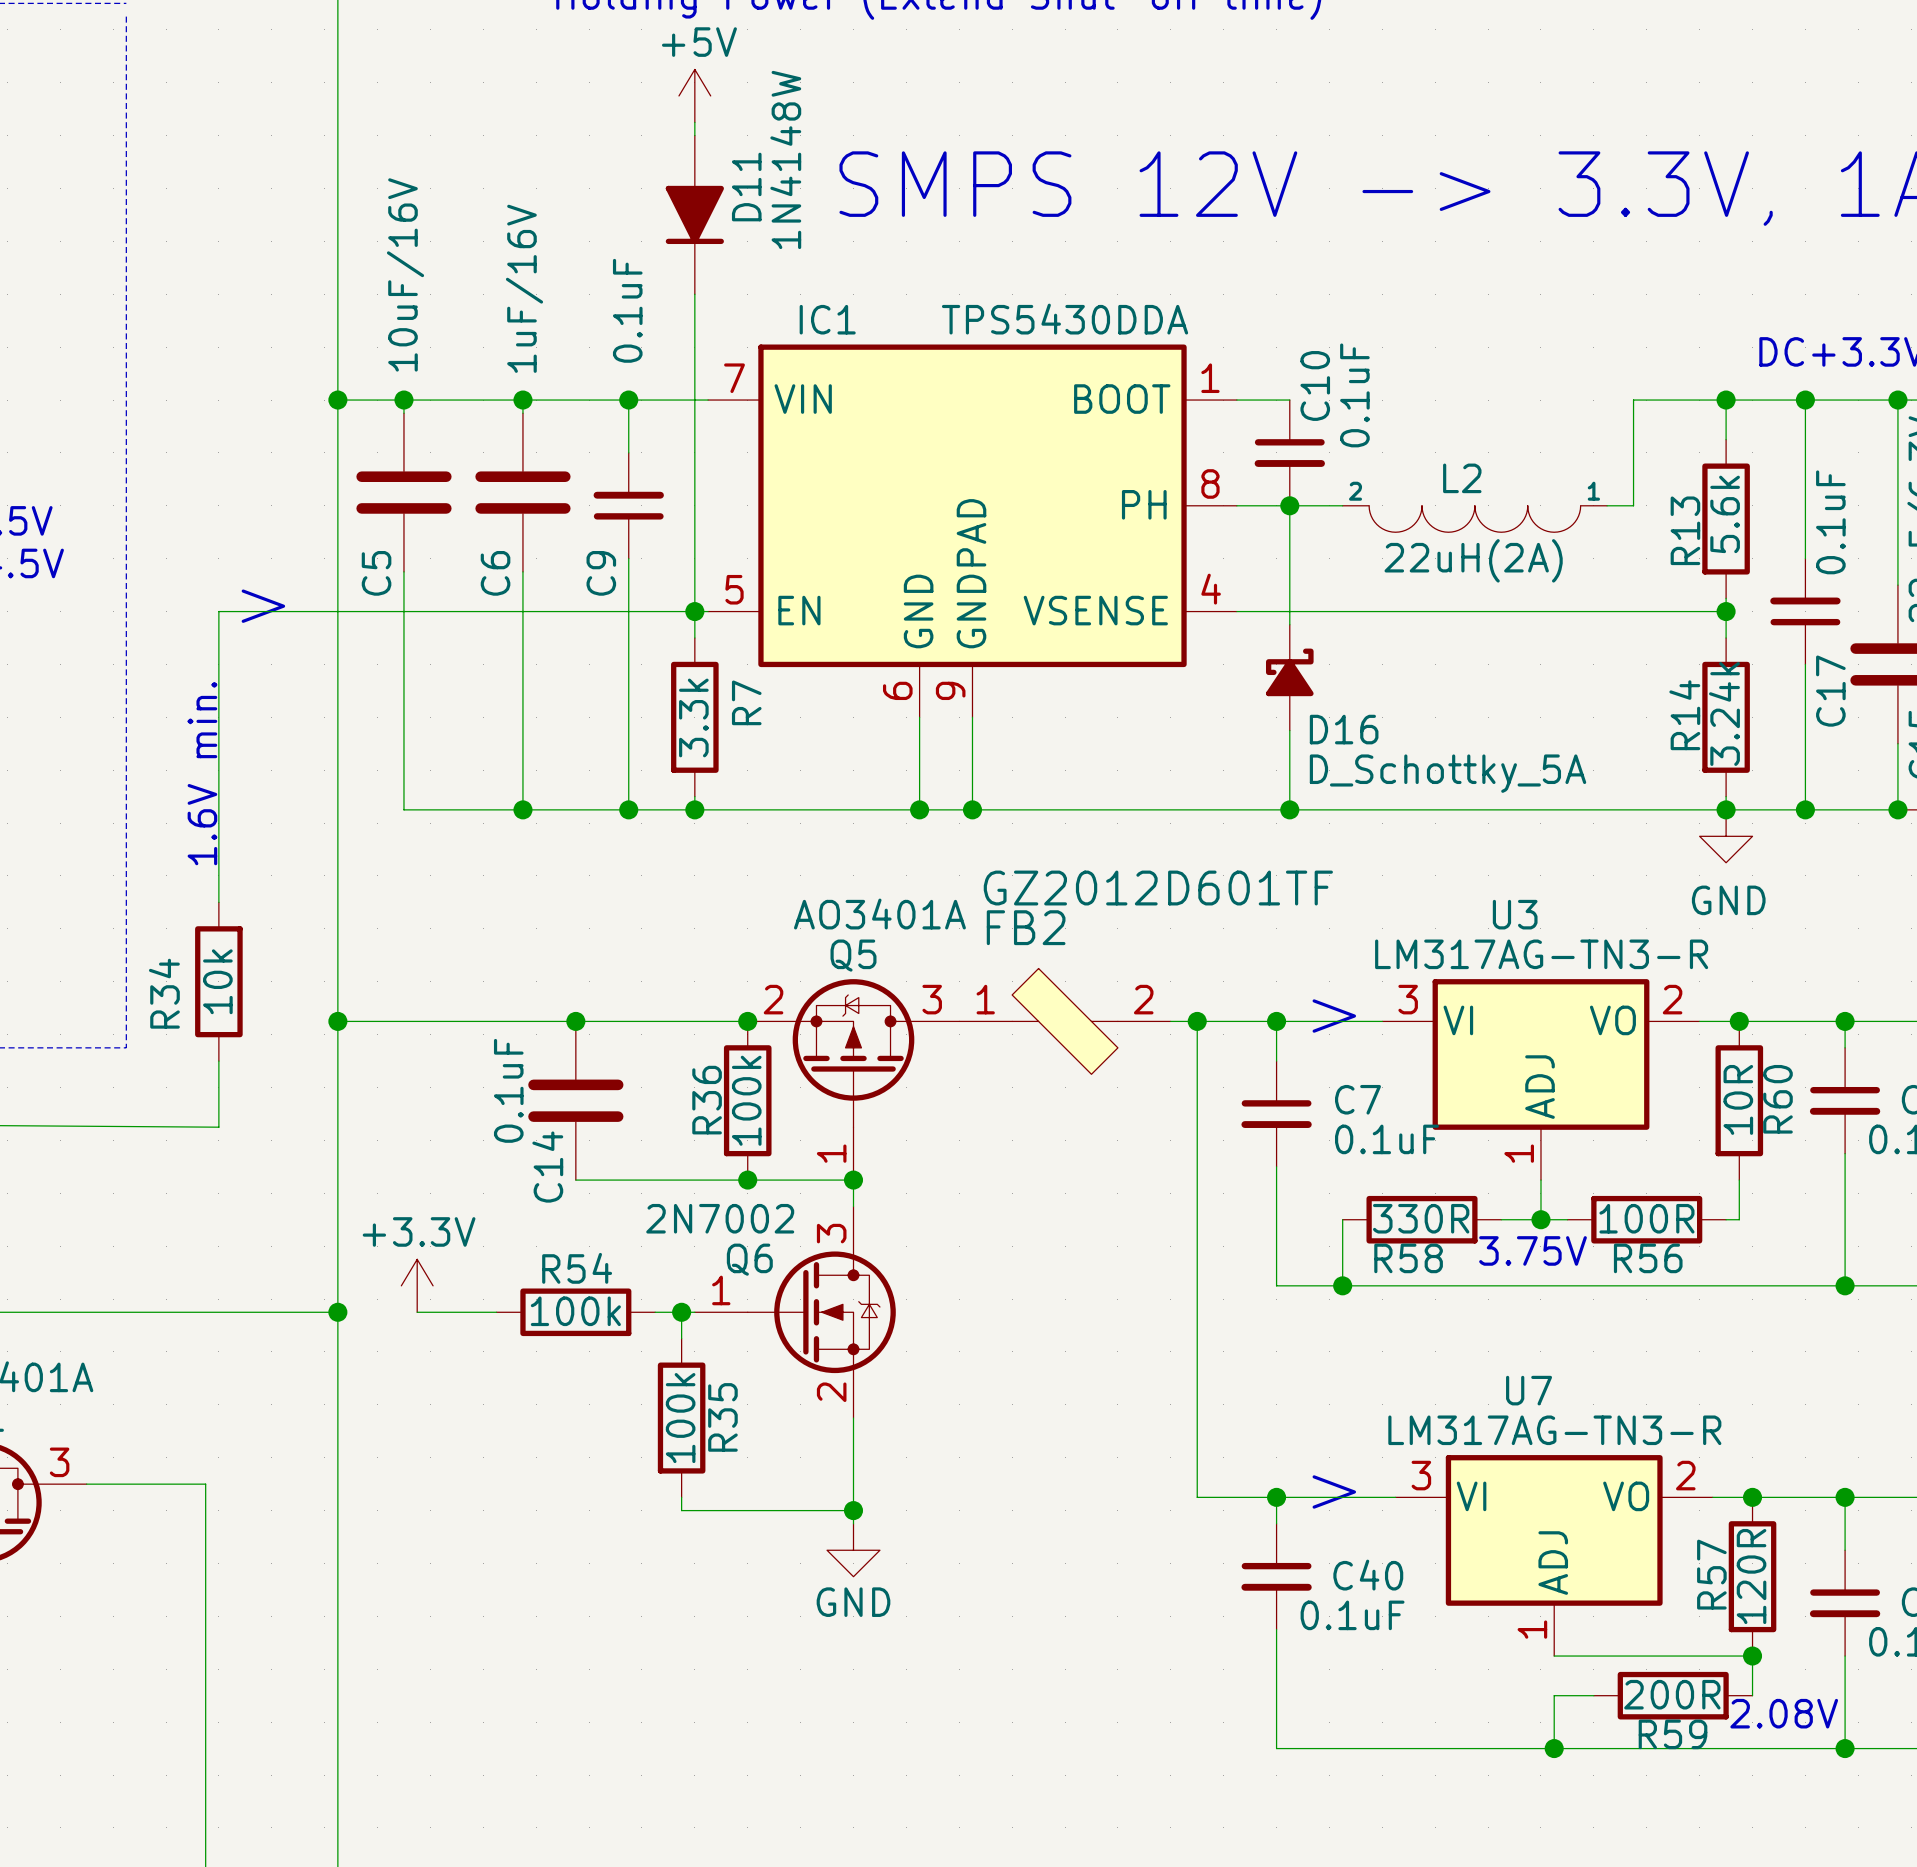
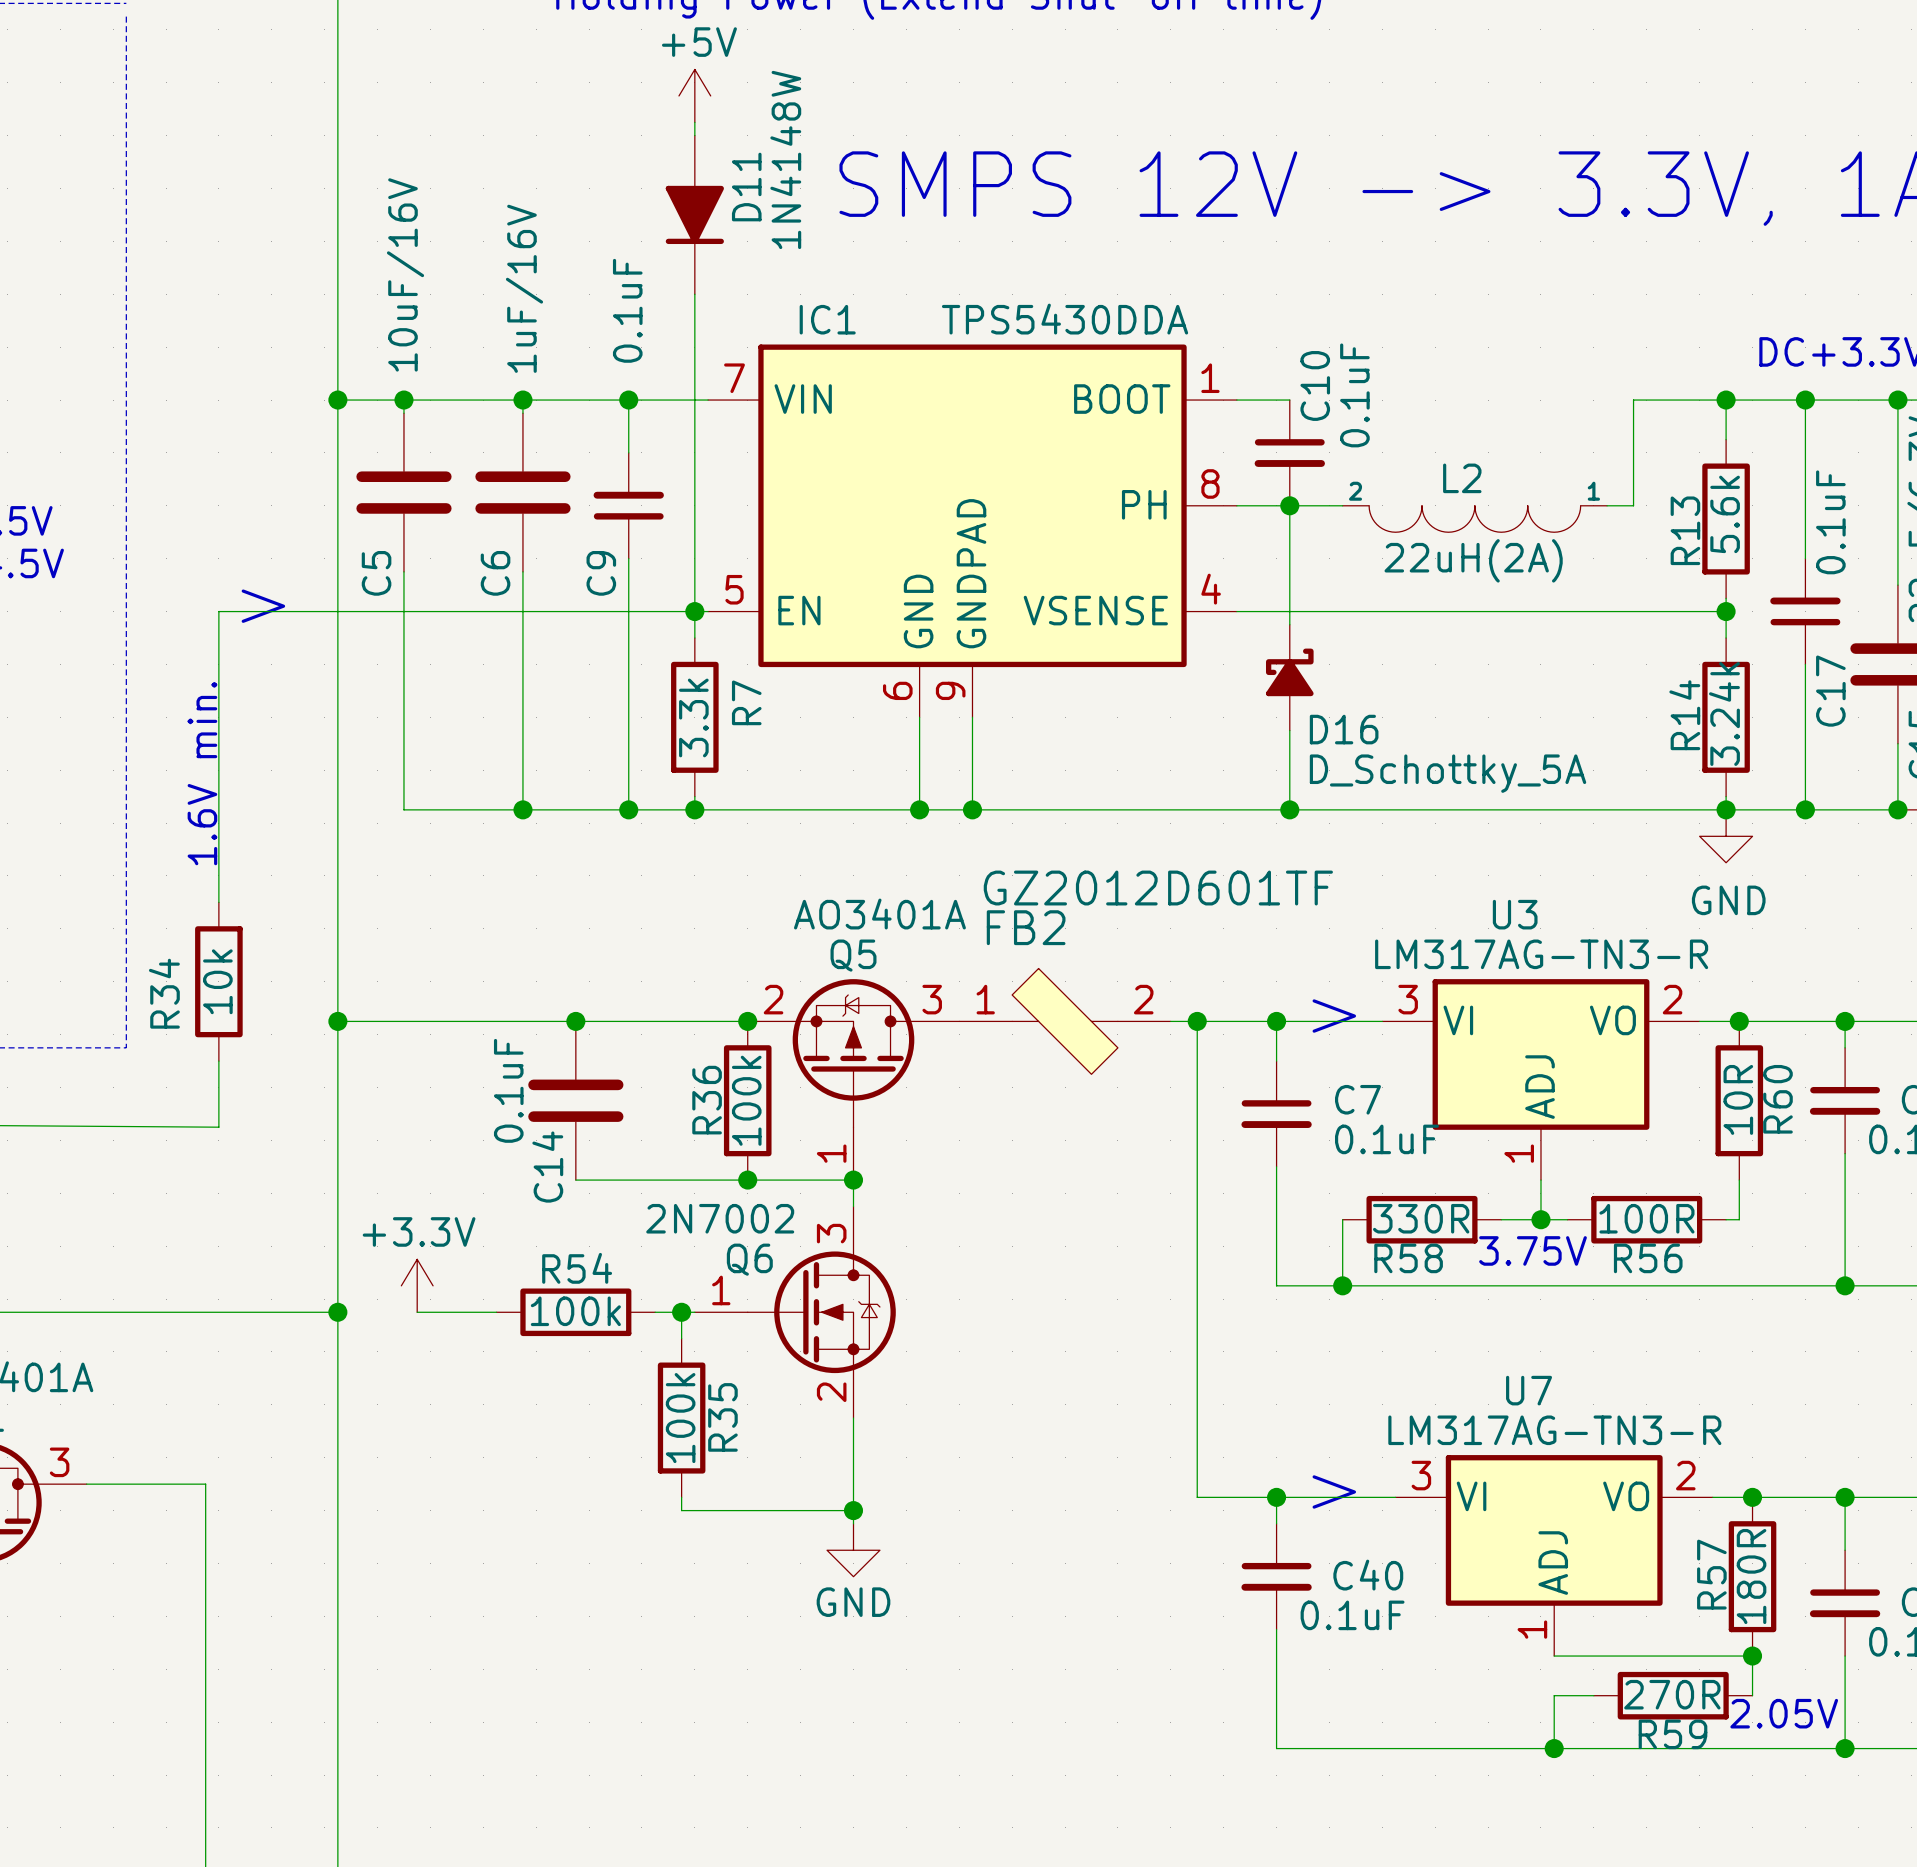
R57 value: 120R (1751, 1576) -> 180R (1751, 1576)
R59 value: 200R (1672, 1694) -> 270R (1672, 1694)
text: 2.08V (1784, 1713) -> 2.05V (1784, 1713)

